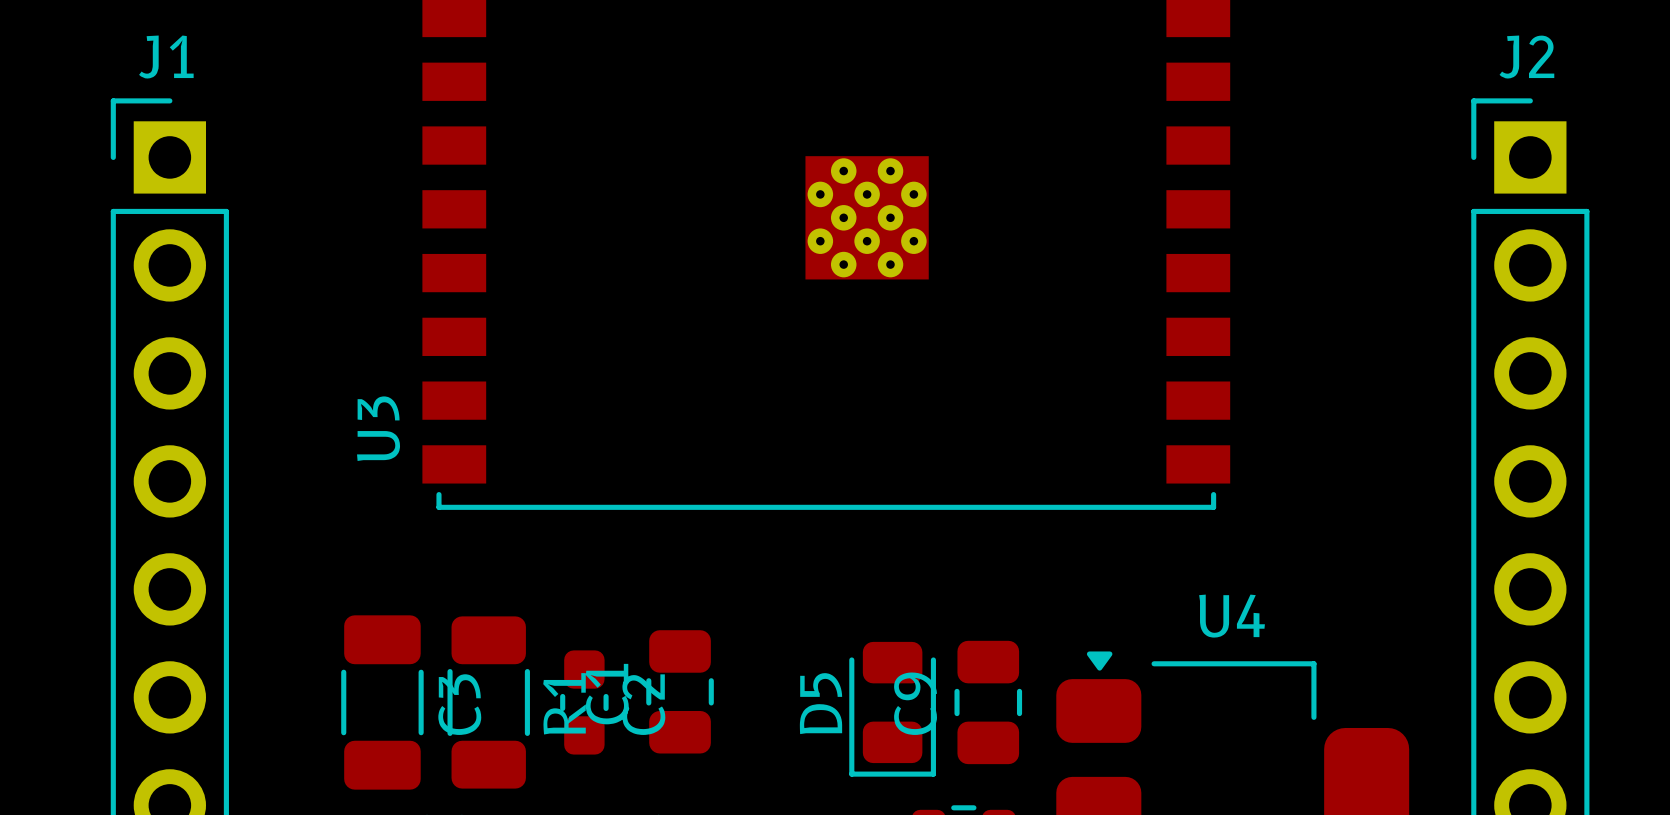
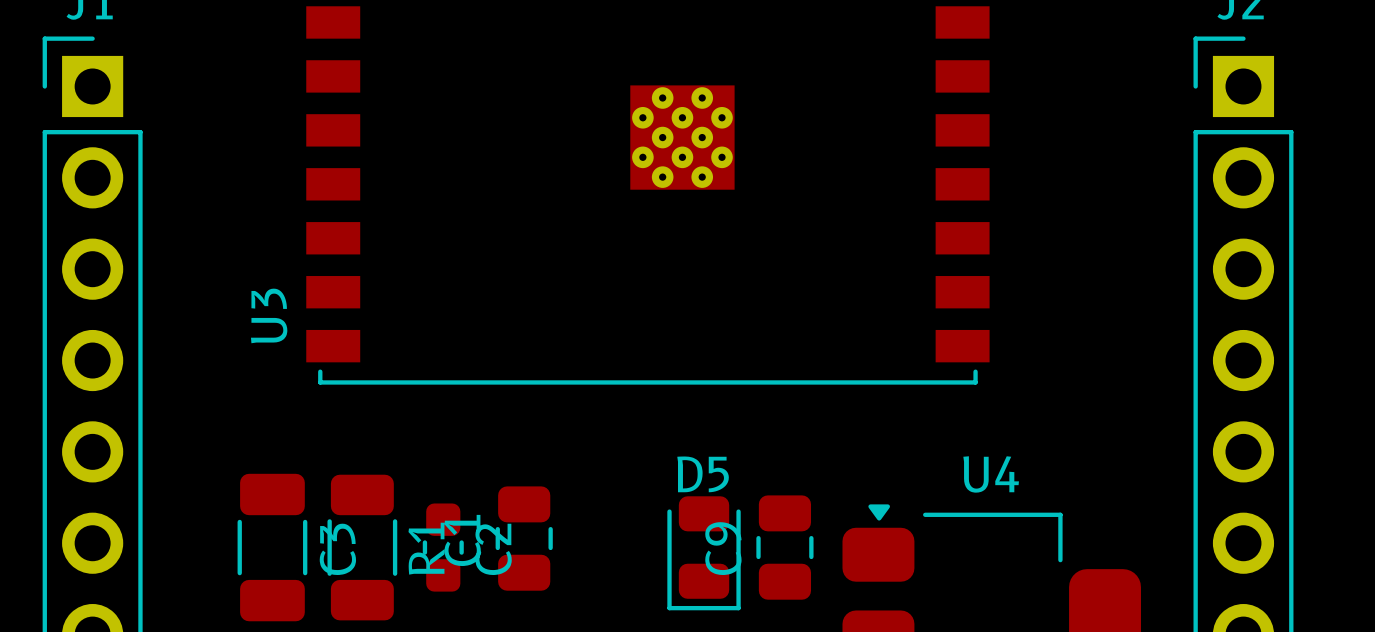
D5 name rotation: 0° (821, 703) -> 90° clockwise (703, 474)
D5 name position: D5 (821, 703) -> D5 (703, 474)

